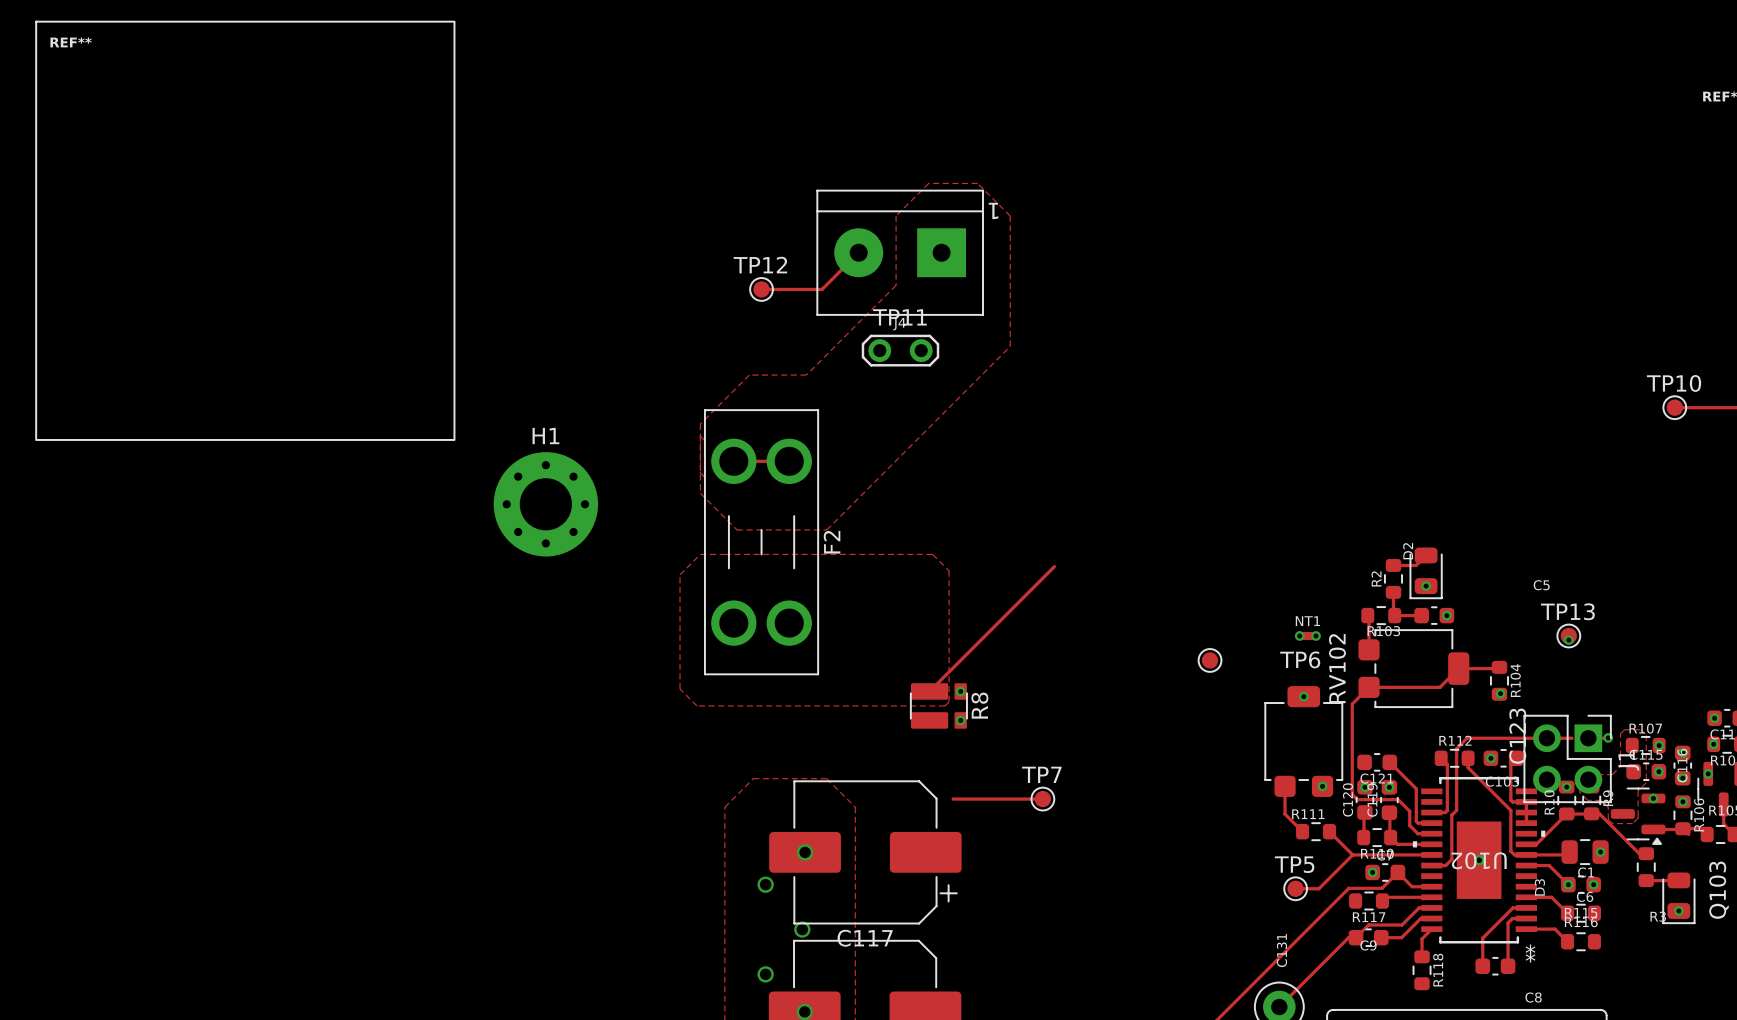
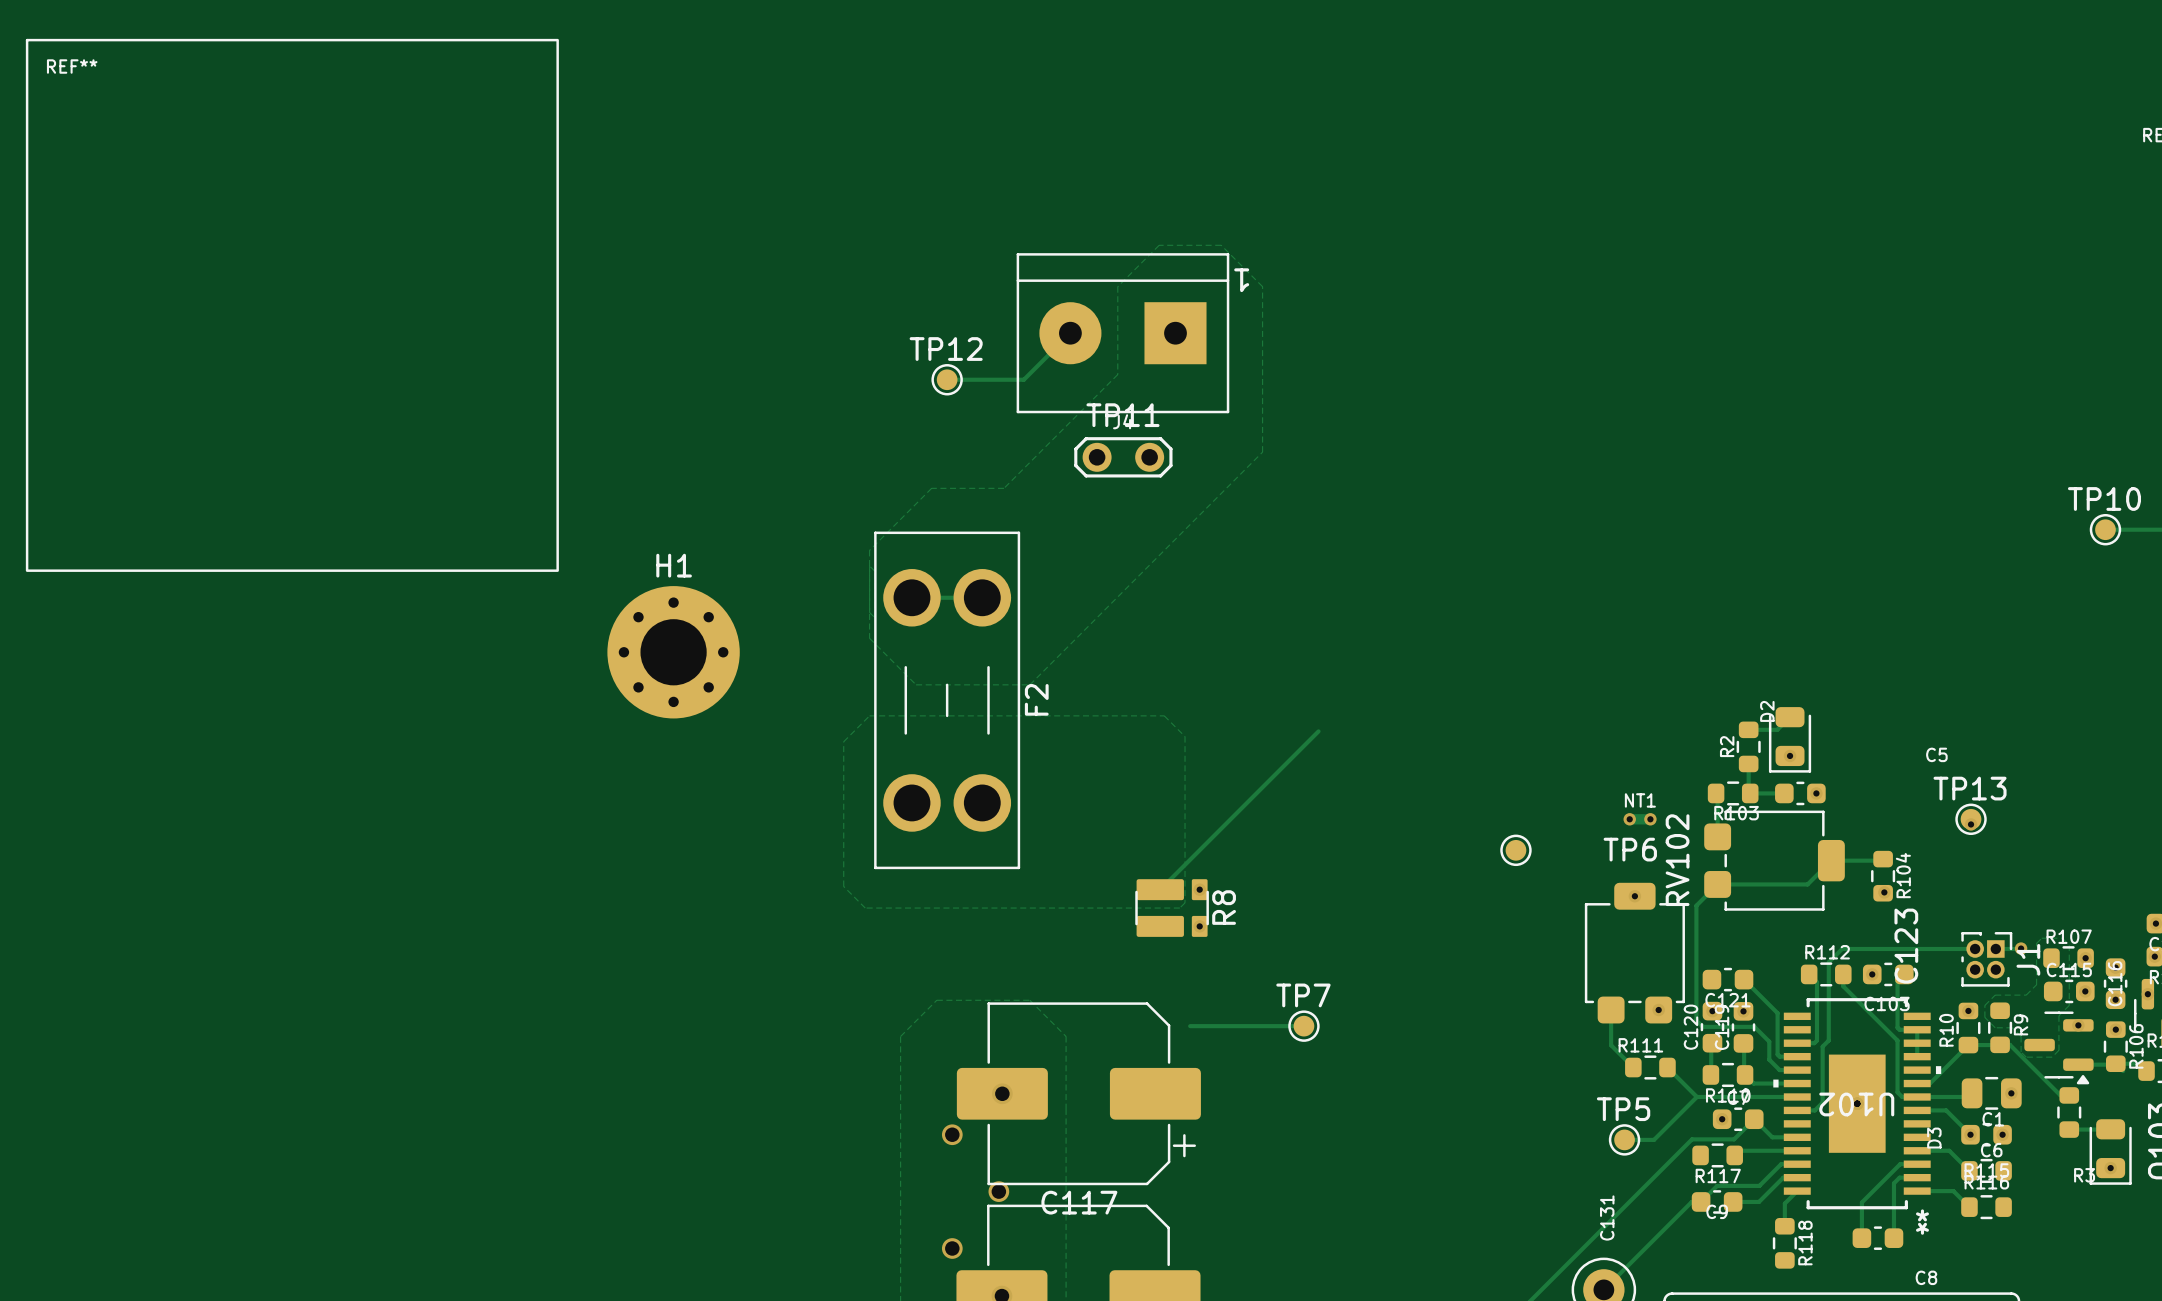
J1 footprint: [1523, 714, 1612, 804] -> [1961, 932, 2013, 987]

